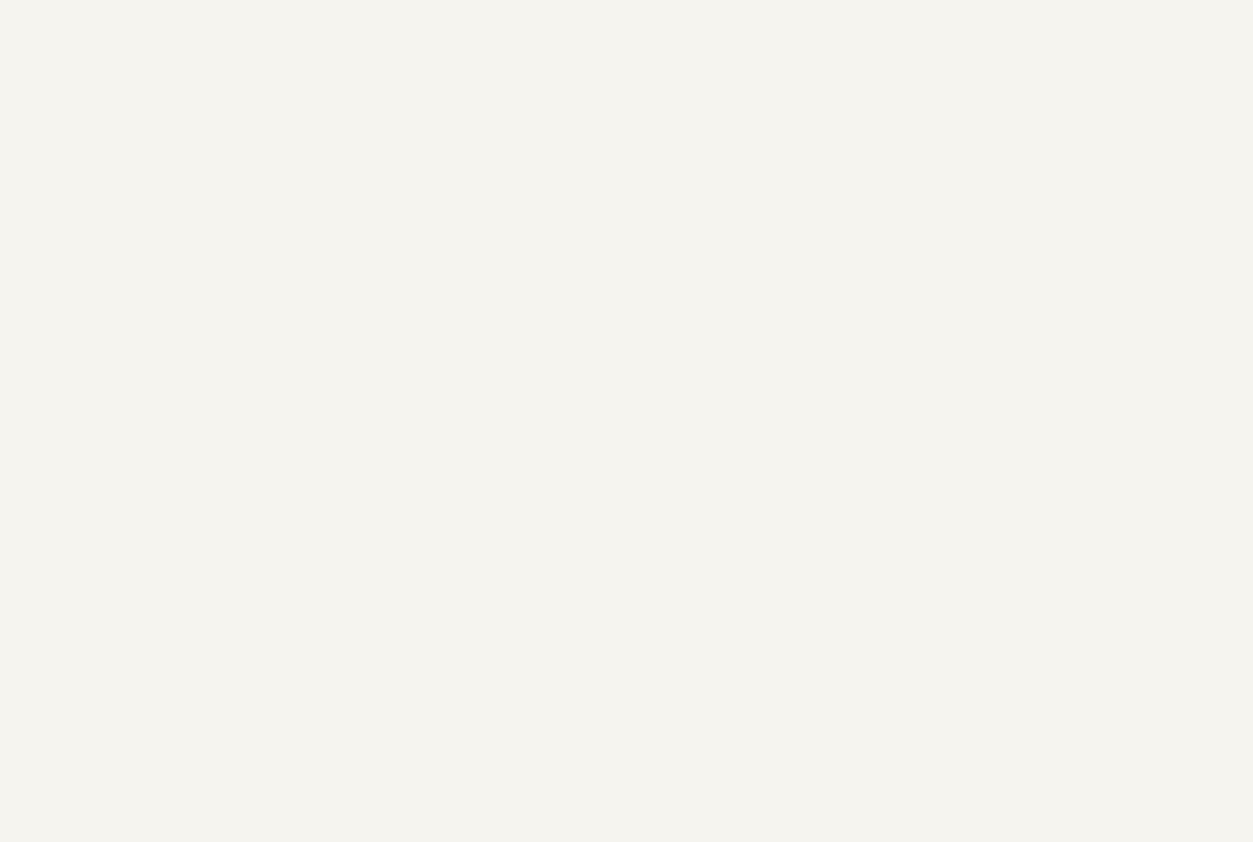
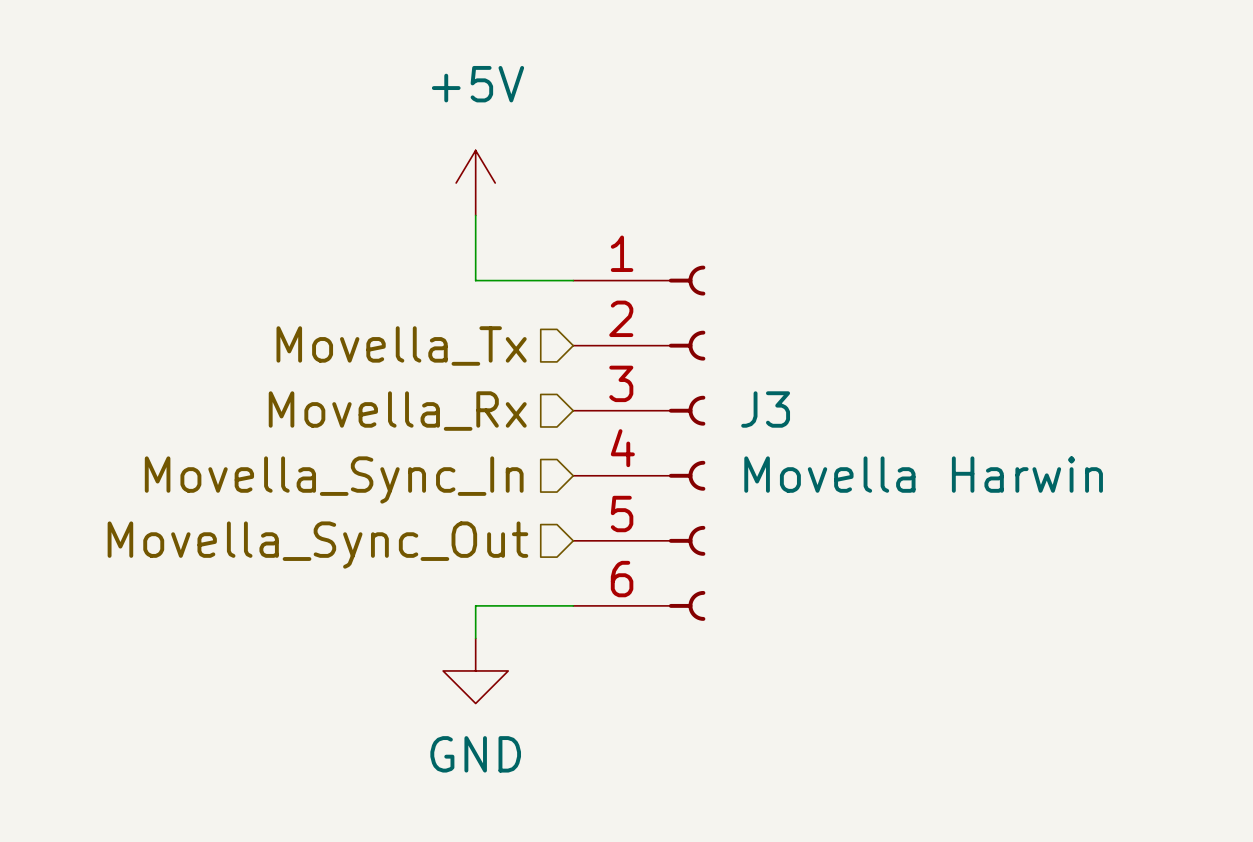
power symbol: none -> +5V (475, 182)
wire: none -> (475, 215) (475, 280) (573, 280)
hierarchical label: none -> Movella_Tx (401, 345)
hierarchical label: none -> Movella_Rx (397, 411)
J3: none -> Movella Harwin (639, 443)
hierarchical label: none -> Movella_Sync_In (334, 479)
hierarchical label: none -> Movella_Sync_Out (317, 545)
wire: none -> (573, 605) (475, 605) (475, 638)
power symbol: none -> GND (475, 670)

